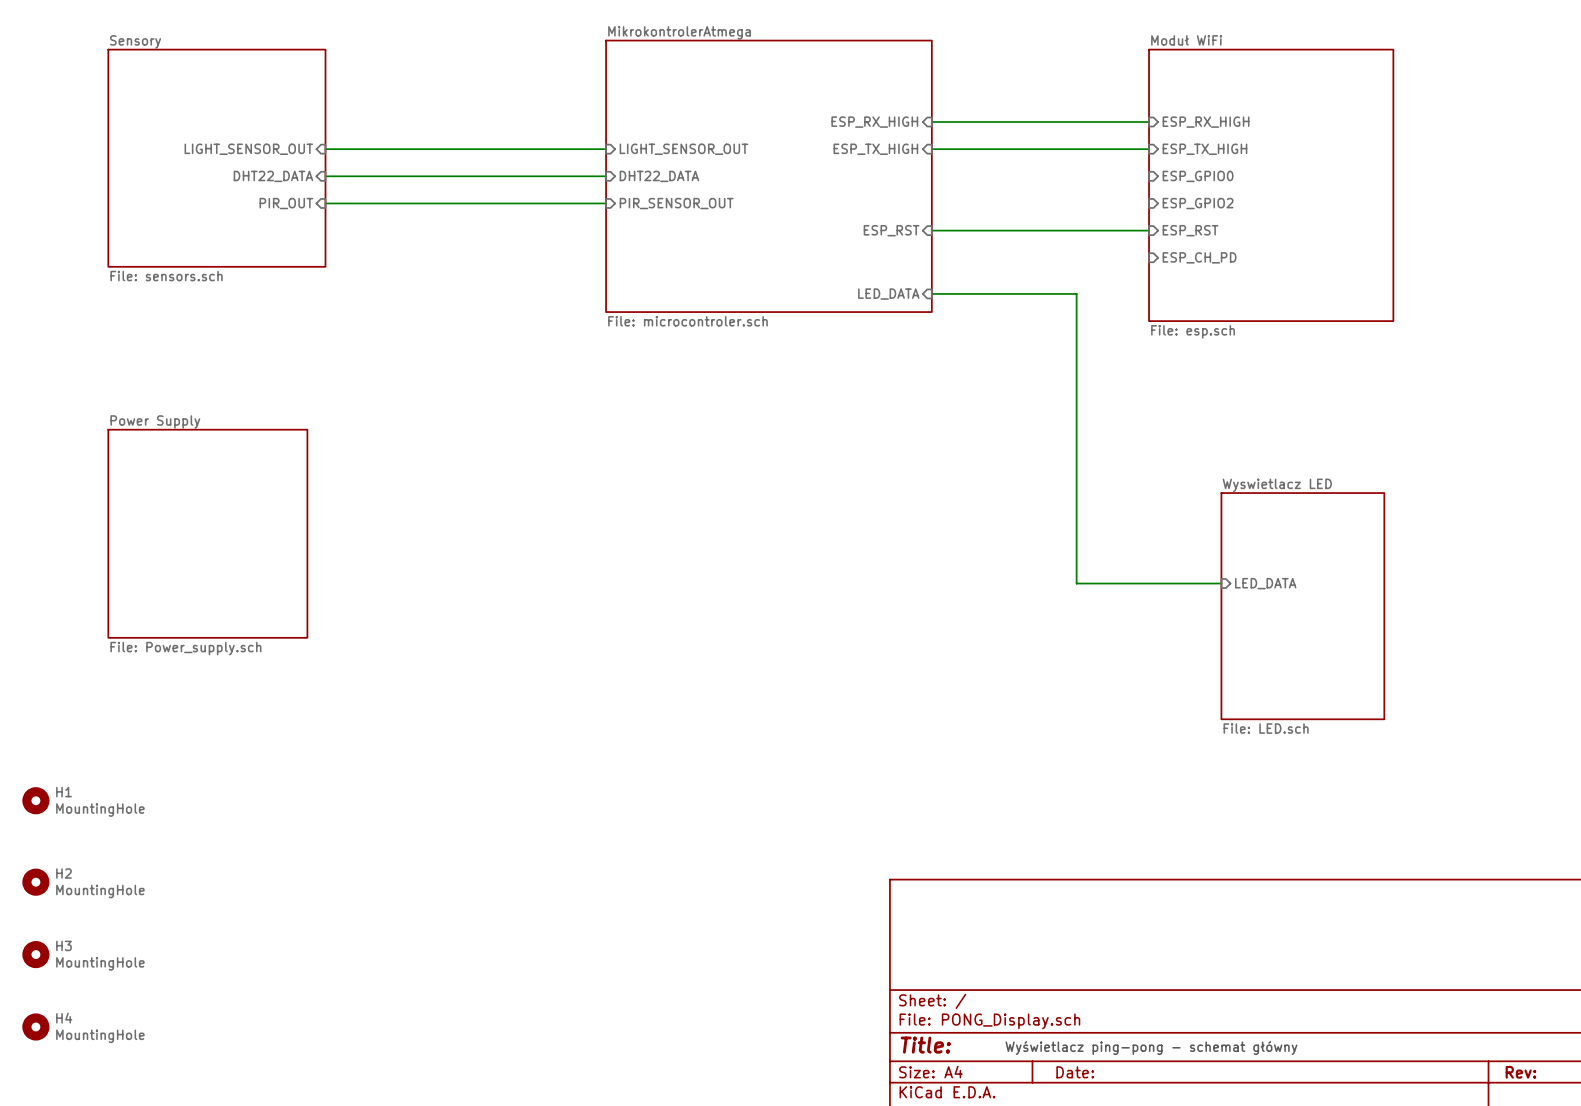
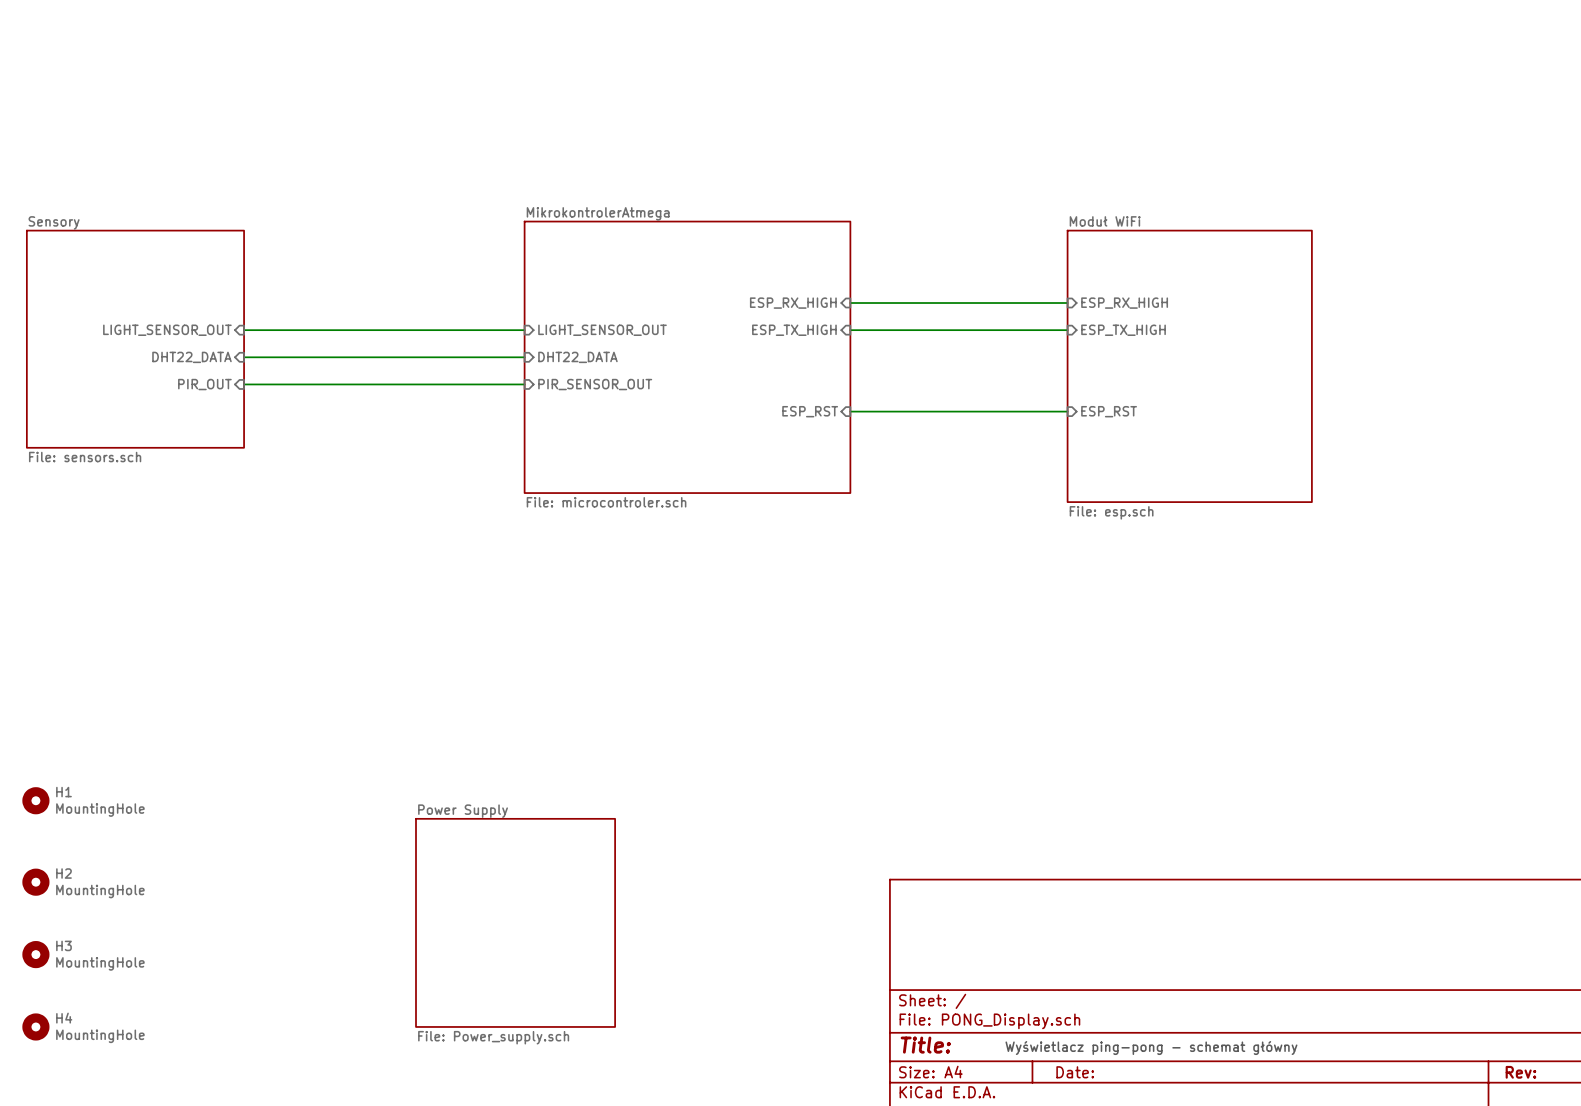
sheet pin: ESP_RX_HIGH (874, 122) -> none
wire: (931, 122) (1149, 122) -> none
sheet pin: ESP_RX_HIGH (1206, 122) -> none
sheet pin: LIGHT_SENSOR_OUT (248, 149) -> none
wire: (325, 149) (606, 149) -> none
sheet pin: LIGHT_SENSOR_OUT (683, 149) -> none
sheet pin: ESP_TX_HIGH (875, 149) -> none
wire: (931, 149) (1149, 149) -> (850, 303) (1067, 303)
sheet pin: ESP_TX_HIGH (1204, 149) -> none
sheet Sensory: File: sensors.sch (216, 158) -> none
sheet pin: DHT22_DATA (273, 176) -> none
wire: (325, 176) (606, 176) -> (244, 330) (524, 330)
sheet pin: DHT22_DATA (659, 176) -> none
sheet MikrokontrolerAtmega: File: microcontroler.sch (768, 176) -> none
sheet pin: ESP_GPIO0 (1198, 176) -> none
sheet Moduł WiFi: File: esp.sch (1271, 185) -> none
sheet pin: PIR_OUT (286, 203) -> none
wire: (325, 203) (606, 203) -> (244, 357) (524, 357)
sheet pin: PIR_SENSOR_OUT (676, 203) -> none
sheet pin: ESP_GPIO2 (1198, 203) -> none
sheet pin: ESP_RST (891, 230) -> none
wire: (931, 230) (1149, 230) -> (850, 330) (1067, 330)
sheet pin: ESP_RST (1190, 230) -> none
sheet pin: ESP_CH_PD (1199, 257) -> none
wire: (931, 293) (1076, 293) (1076, 583) (1221, 583) -> none
sheet pin: LED_DATA (888, 294) -> none
sheet pin: none -> ESP_RX_HIGH (793, 303)
sheet pin: none -> ESP_RX_HIGH (1124, 303)
sheet pin: none -> LIGHT_SENSOR_OUT (167, 330)
sheet pin: none -> LIGHT_SENSOR_OUT (602, 330)
sheet pin: none -> ESP_TX_HIGH (794, 330)
sheet pin: none -> ESP_TX_HIGH (1123, 330)
sheet Sensory: none -> File: sensors.sch (135, 339)
sheet pin: none -> DHT22_DATA (191, 357)
sheet pin: none -> DHT22_DATA (577, 357)
sheet MikrokontrolerAtmega: none -> File: microcontroler.sch (687, 357)
sheet Moduł WiFi: none -> File: esp.sch (1189, 366)
sheet pin: none -> PIR_OUT (204, 384)
wire: none -> (244, 384) (524, 384)
sheet pin: none -> PIR_SENSOR_OUT (595, 384)
sheet pin: none -> ESP_RST (810, 411)
wire: none -> (850, 411) (1067, 411)
sheet pin: none -> ESP_RST (1109, 411)
sheet Power Supply: File: Power_supply.sch (207, 533) -> none
sheet pin: LED_DATA (1265, 583) -> none
sheet Wyswietlacz LED: File: LED.sch (1302, 606) -> none
sheet Power Supply: none -> File: Power_supply.sch (515, 922)

